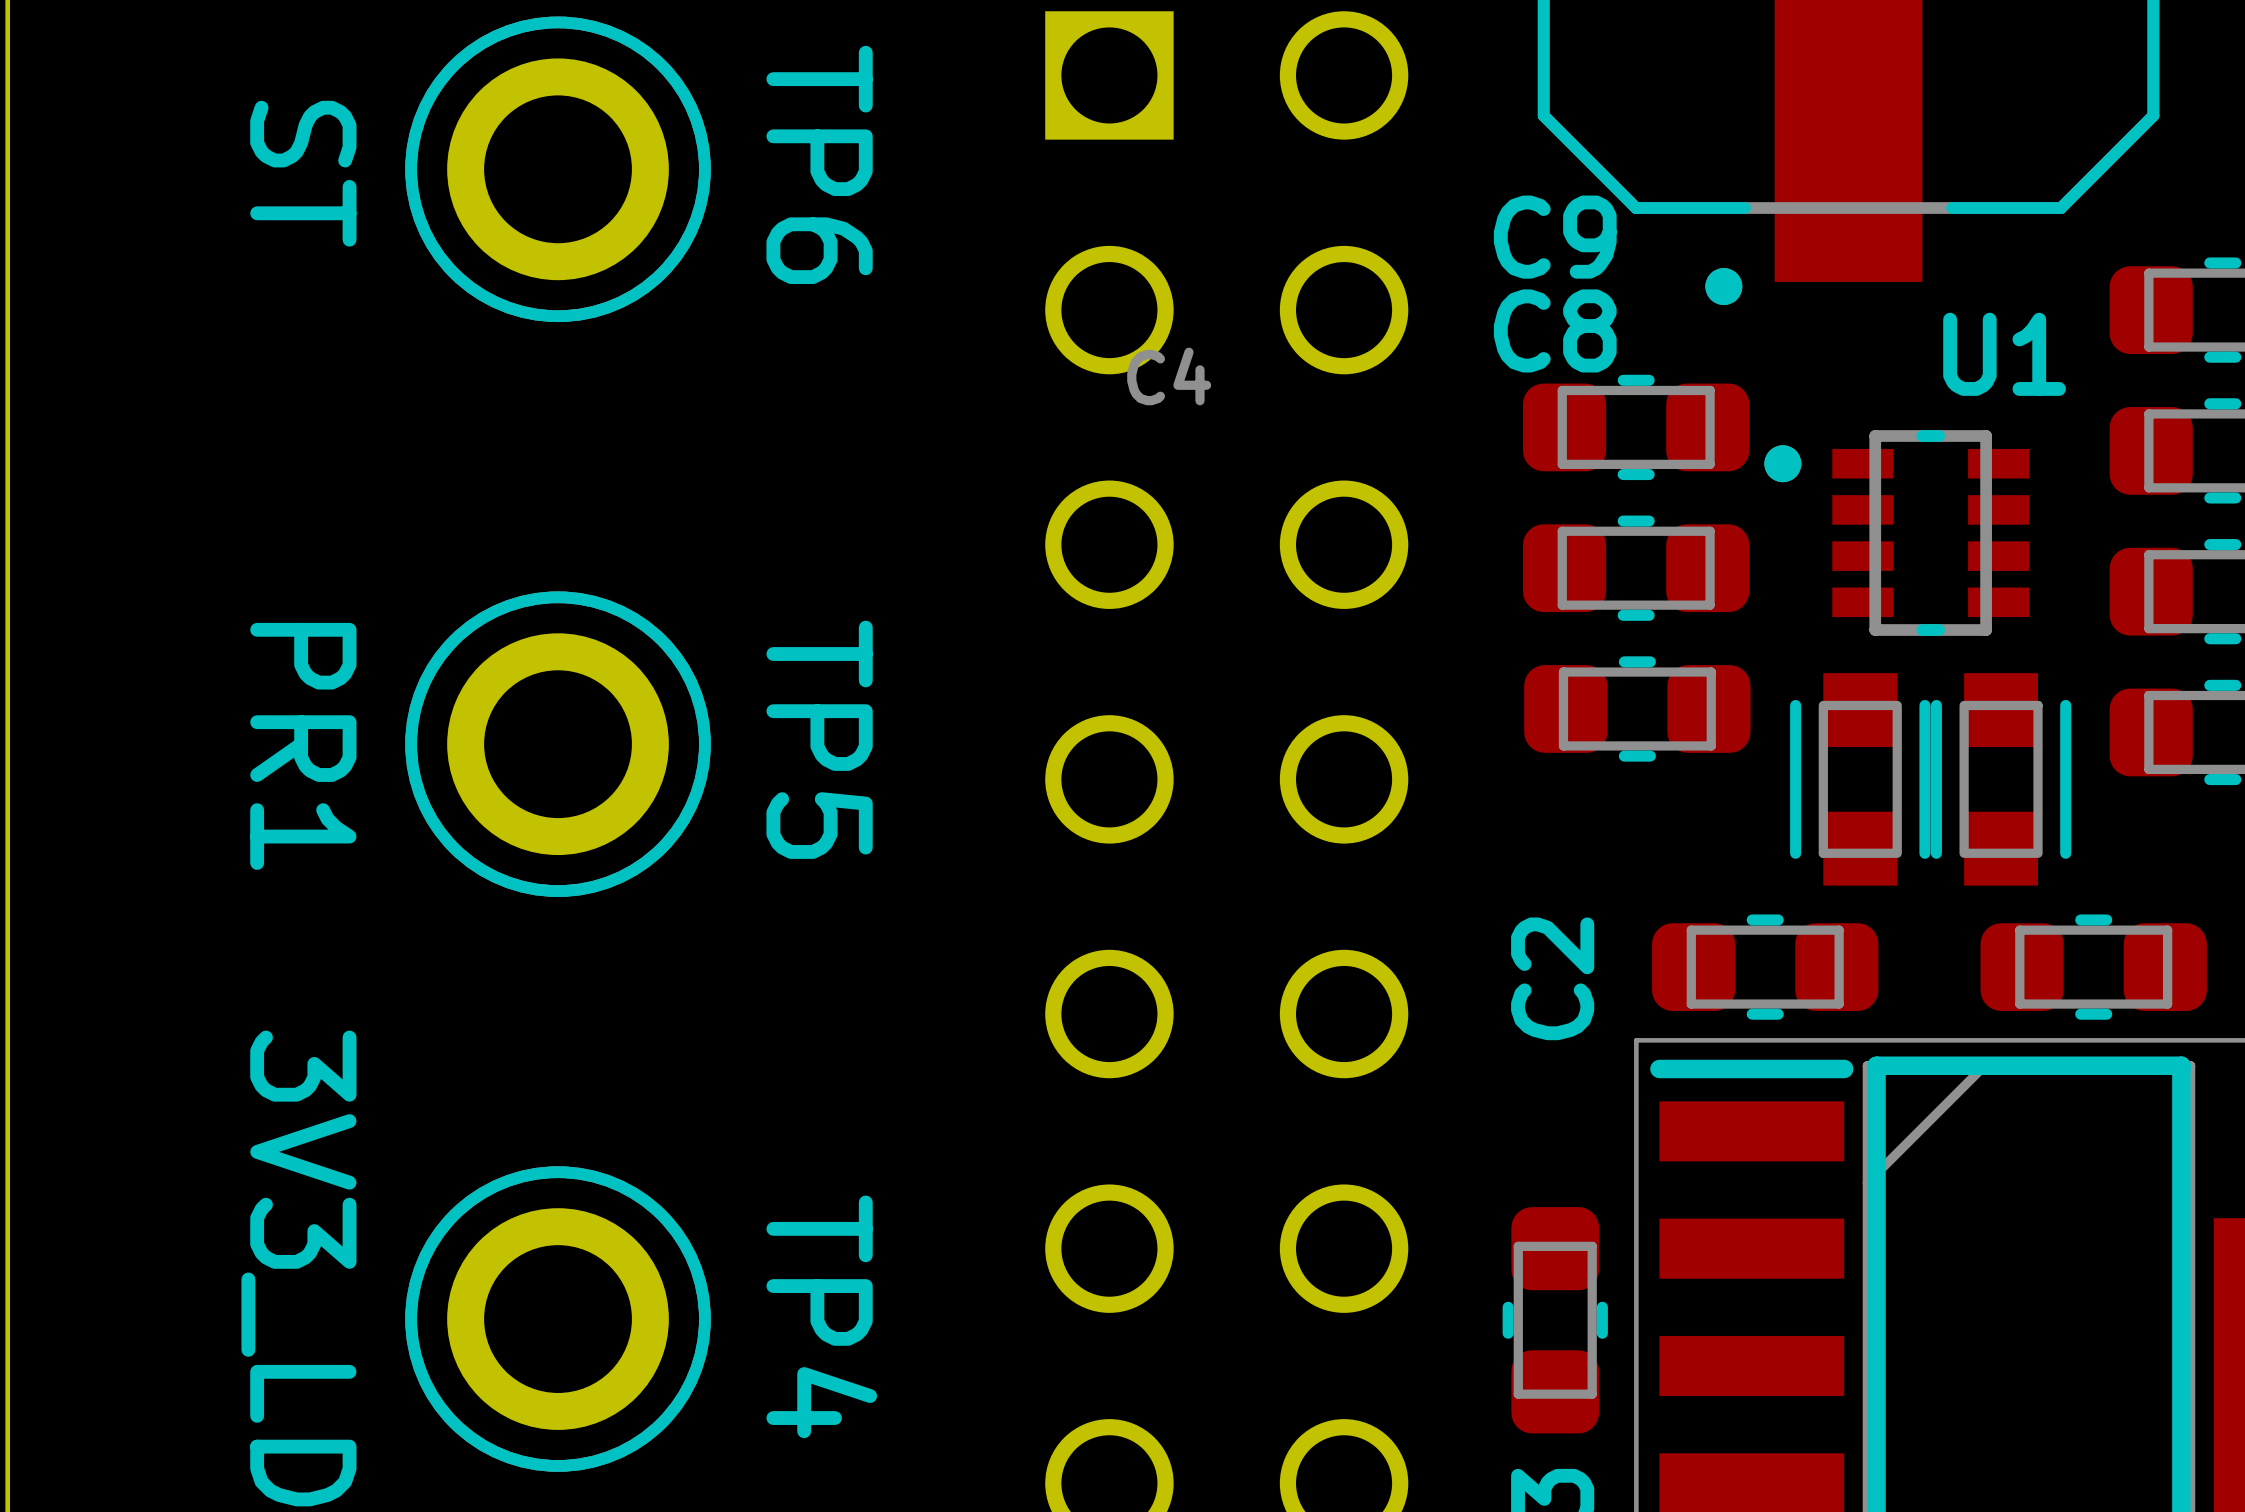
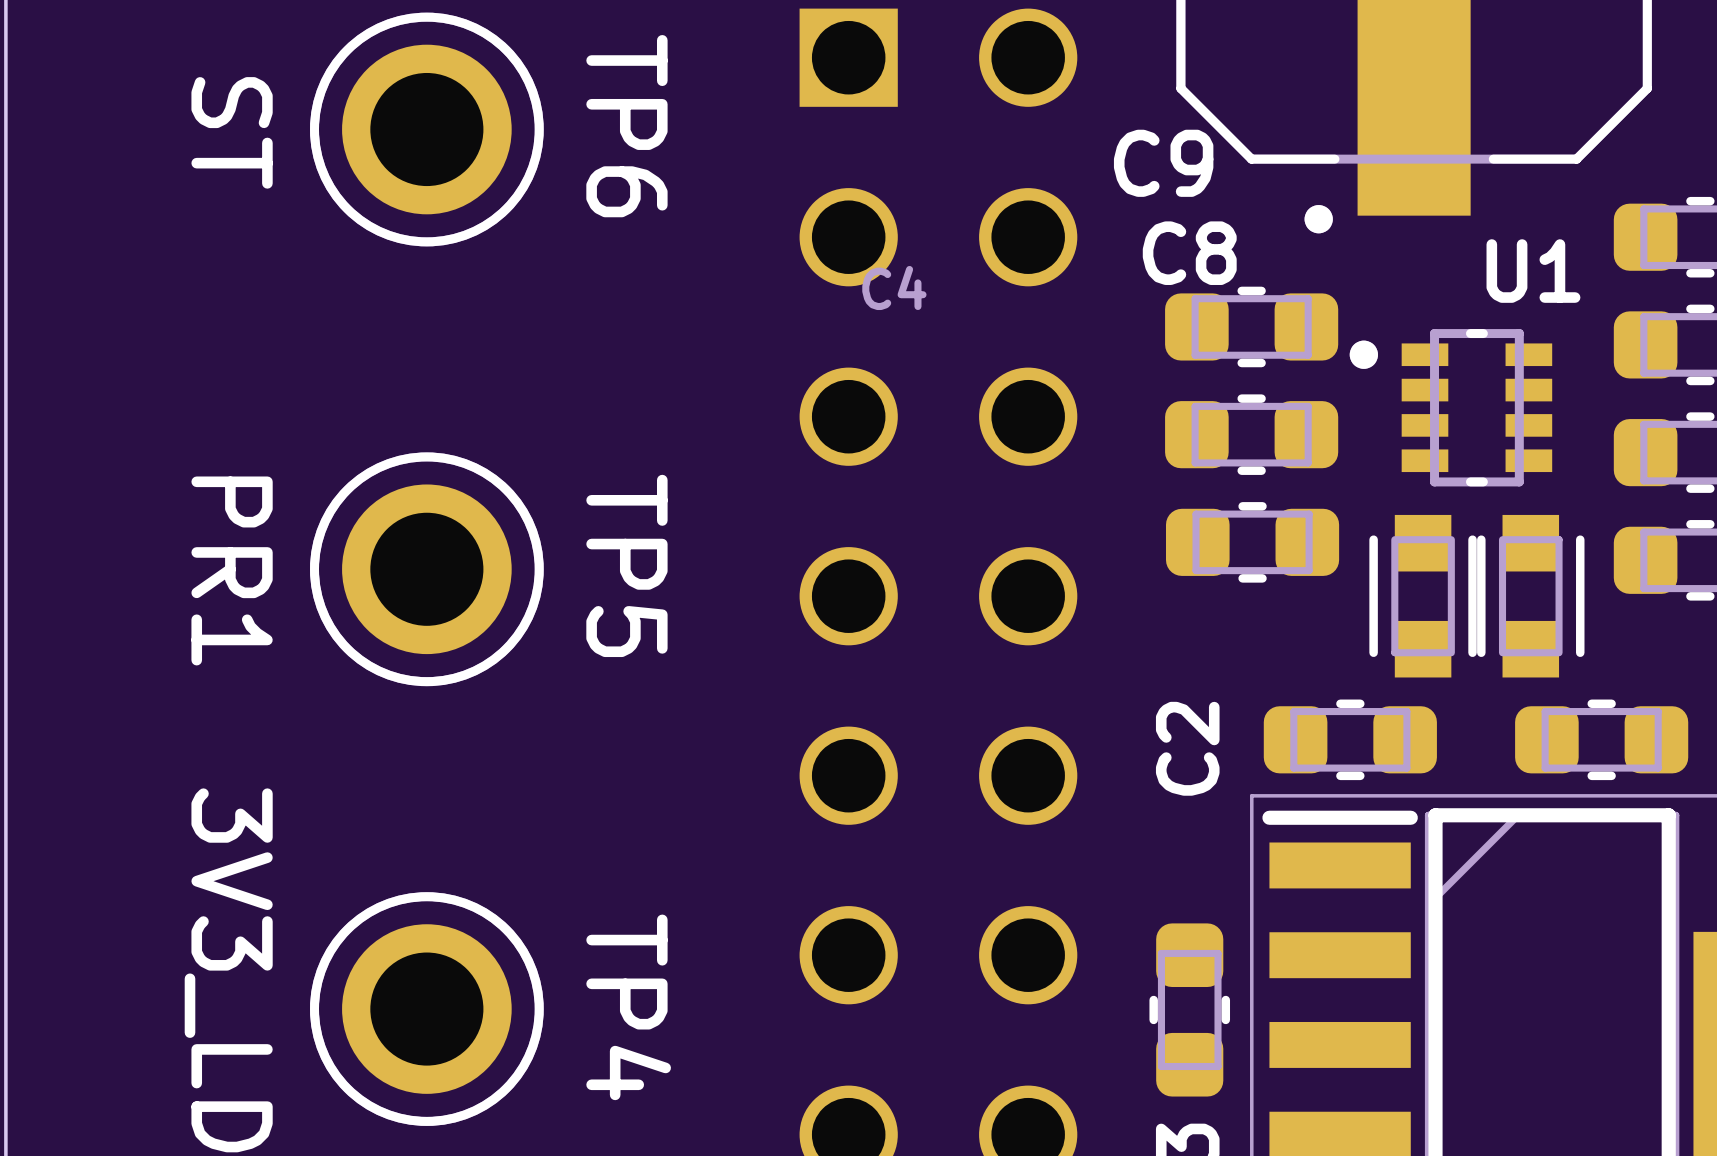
C9 name position: C9 (1555, 237) -> C9 (1163, 163)

